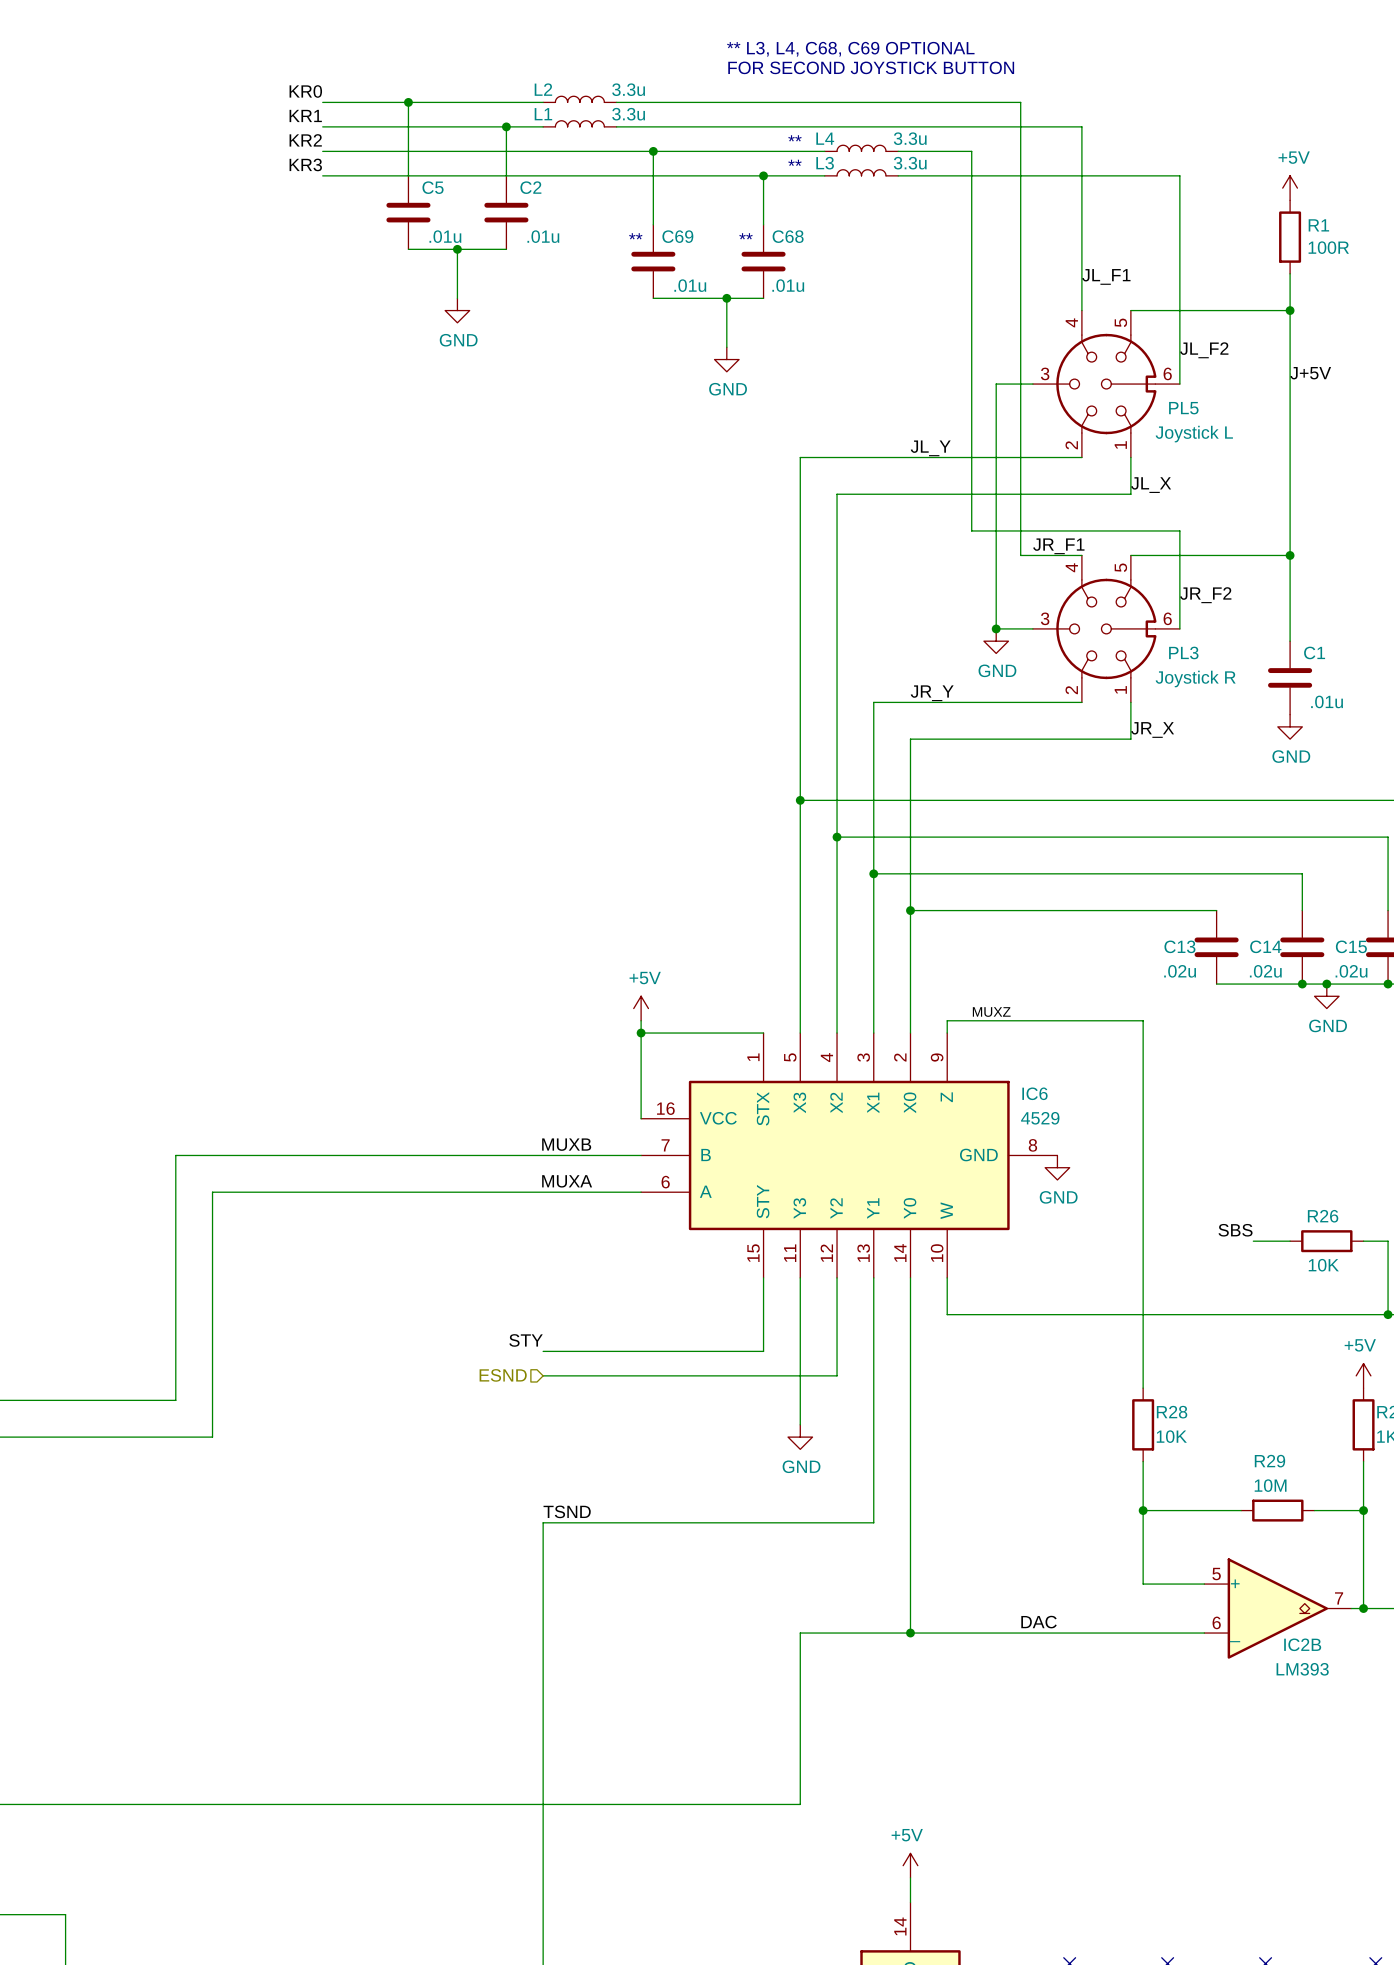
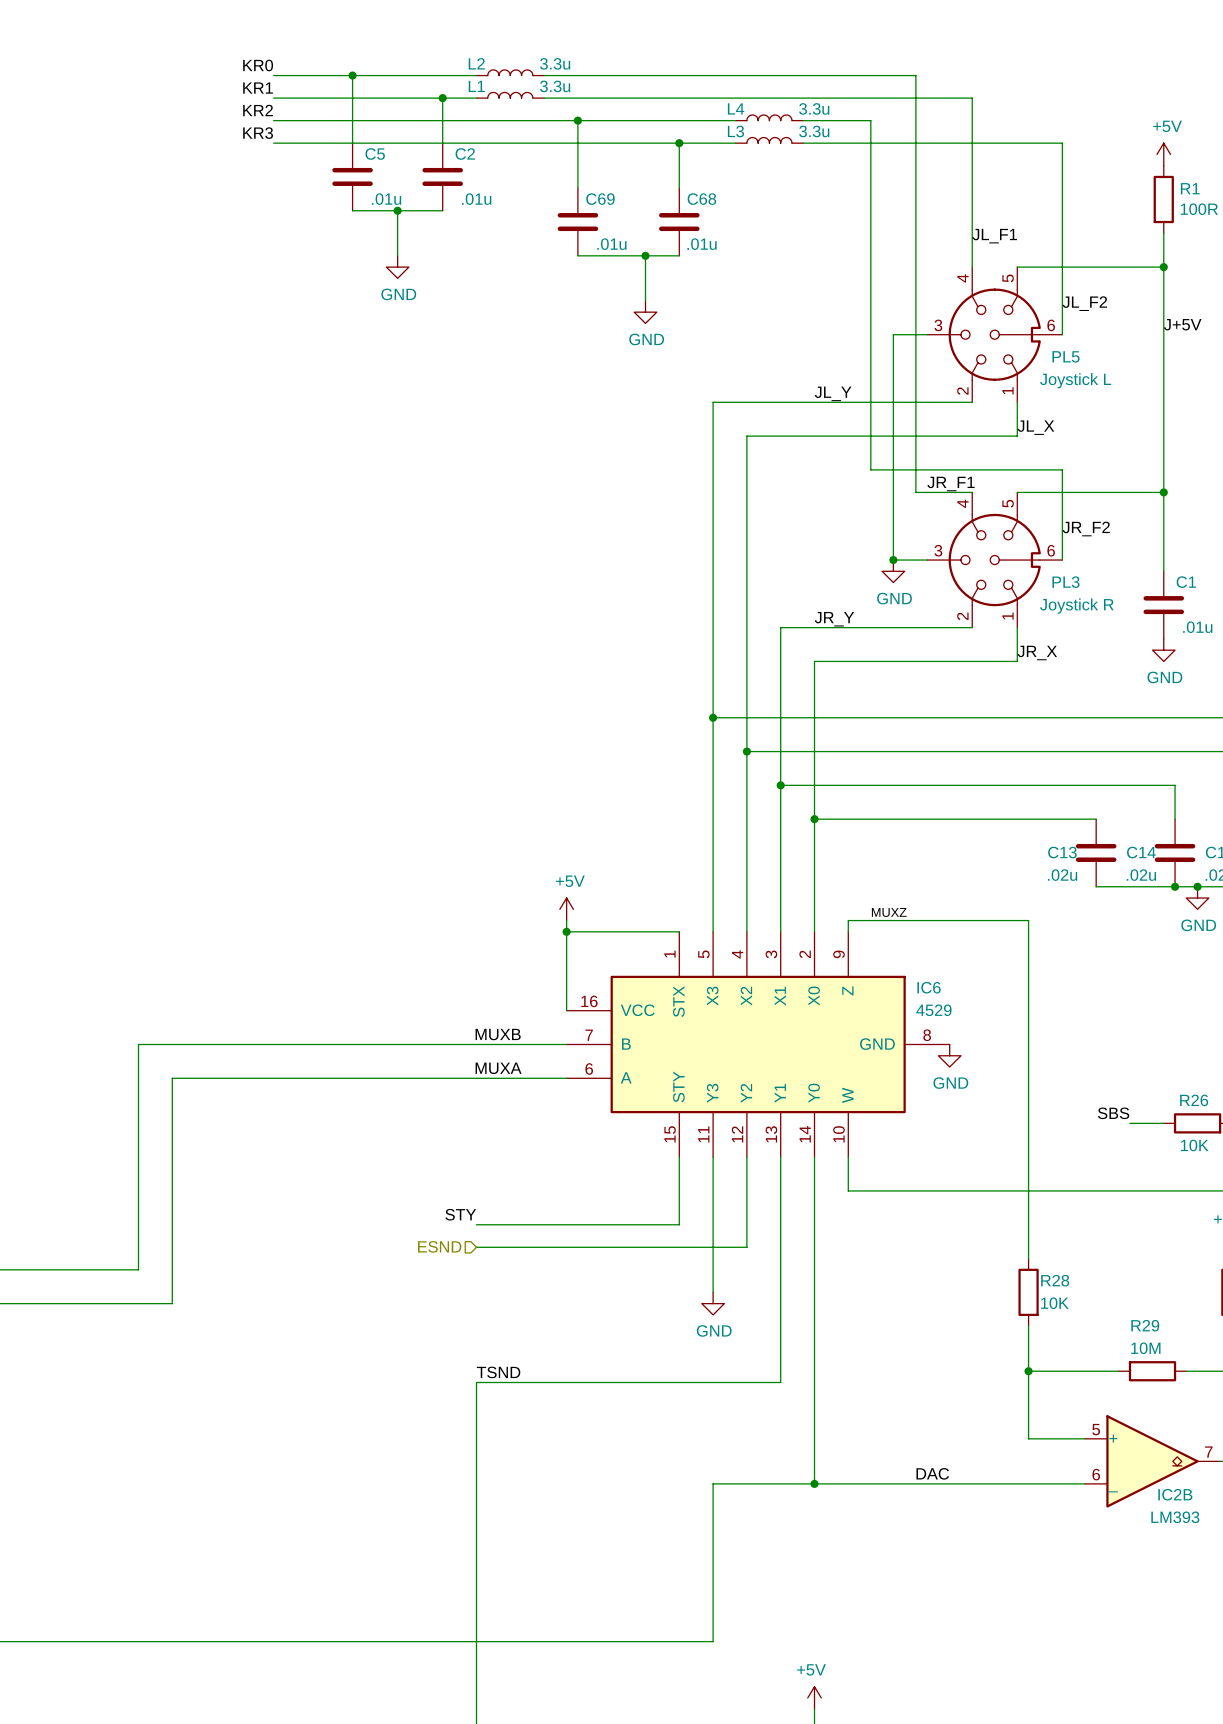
text: ** L3, L4, C68, C69 OPTIONAL (850, 49) -> none
text: FOR SECOND JOYSTICK BUTTON (871, 67) -> none
text: ** (794, 138) -> none
text: ** (794, 162) -> none
text: ** (635, 236) -> none
text: ** (745, 236) -> none

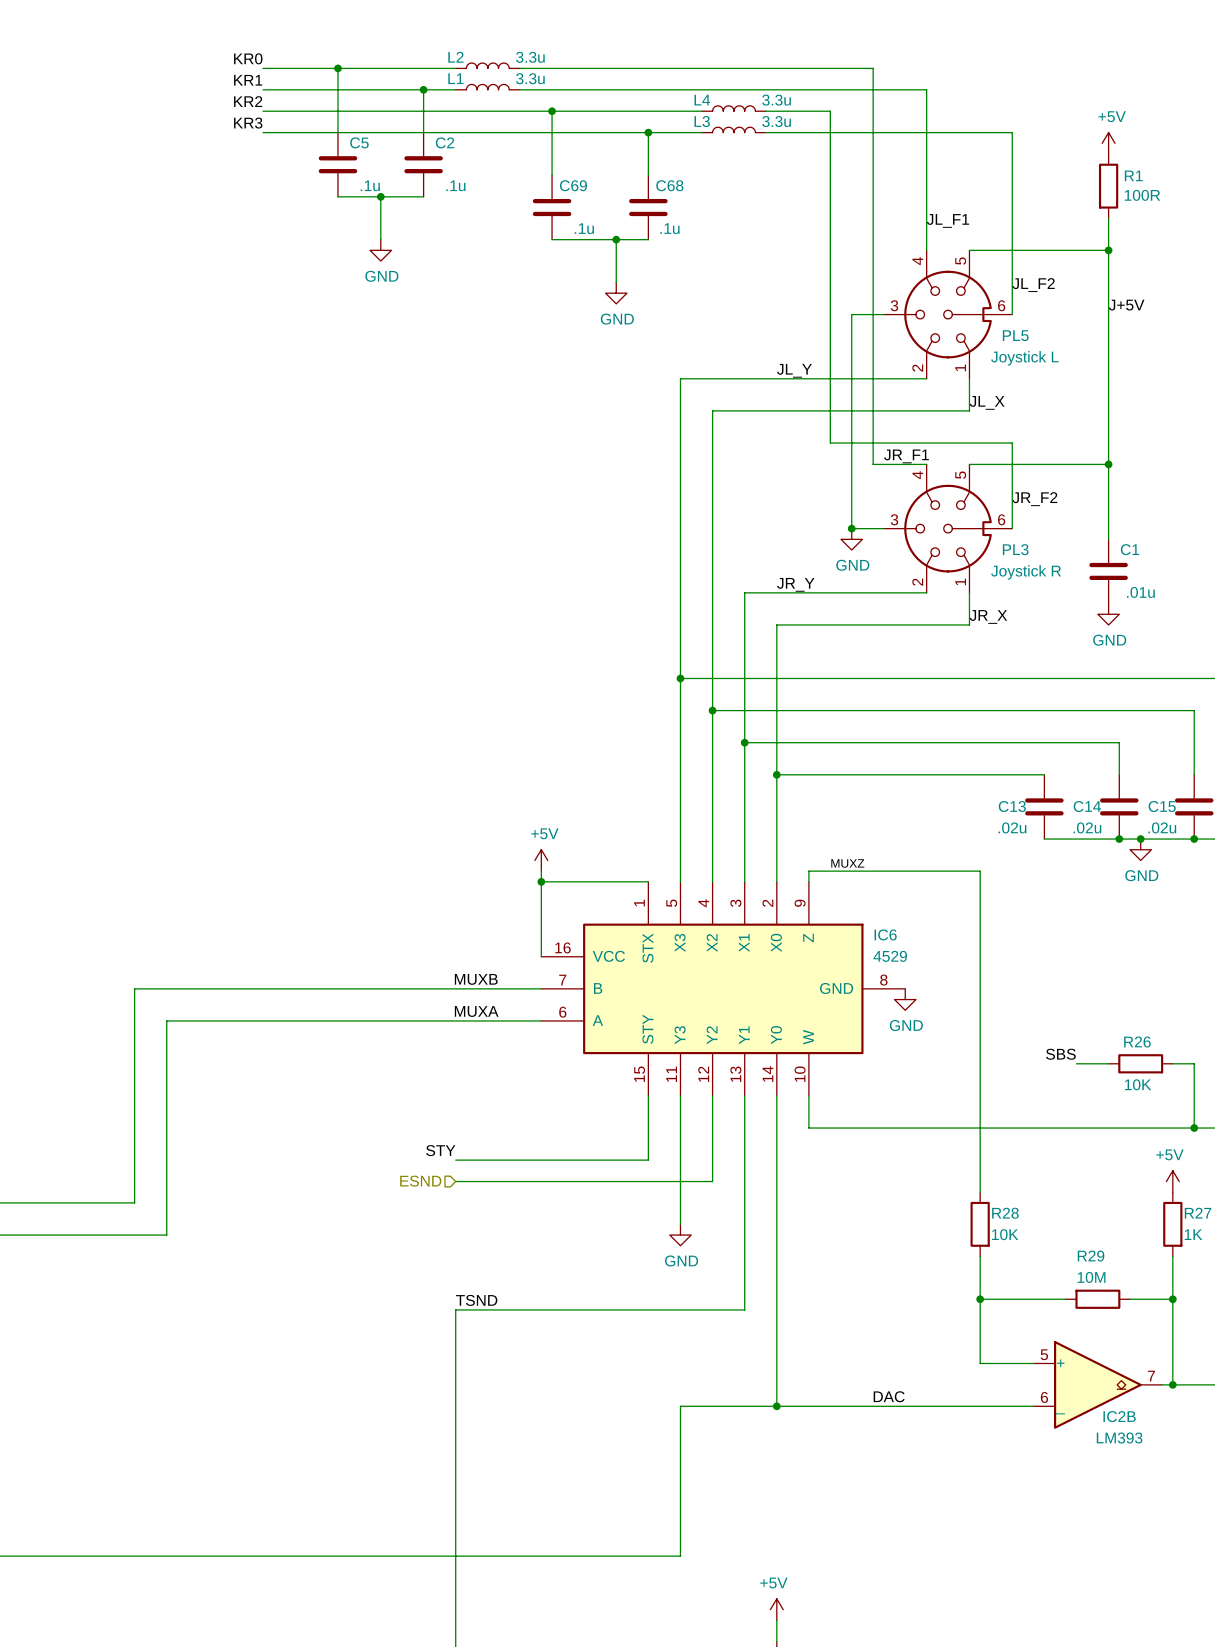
C5 value: .01u (386, 199) -> .1u (370, 185)
C2 value: .01u (476, 199) -> .1u (455, 185)
C69 value: .01u (611, 244) -> .1u (584, 228)
C68 value: .01u (702, 244) -> .1u (669, 228)

